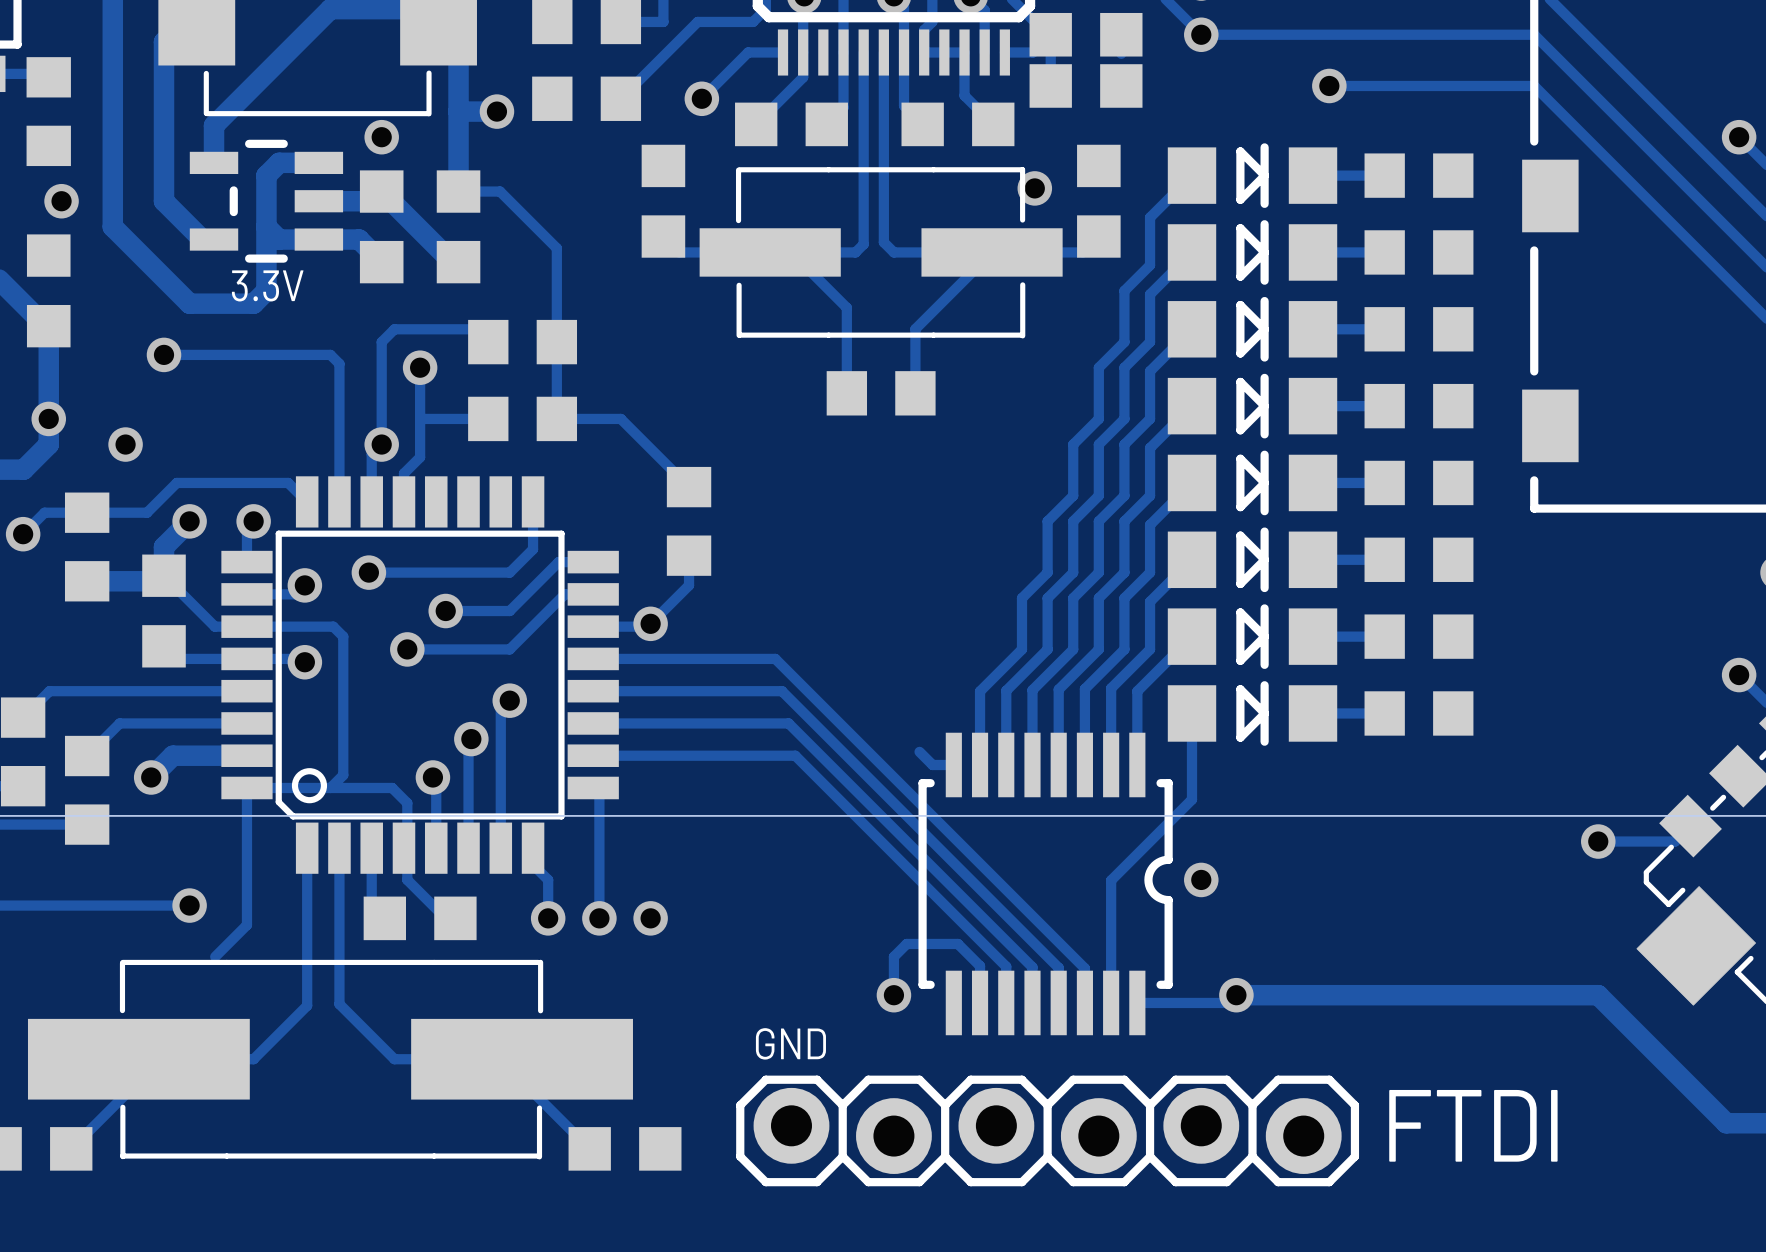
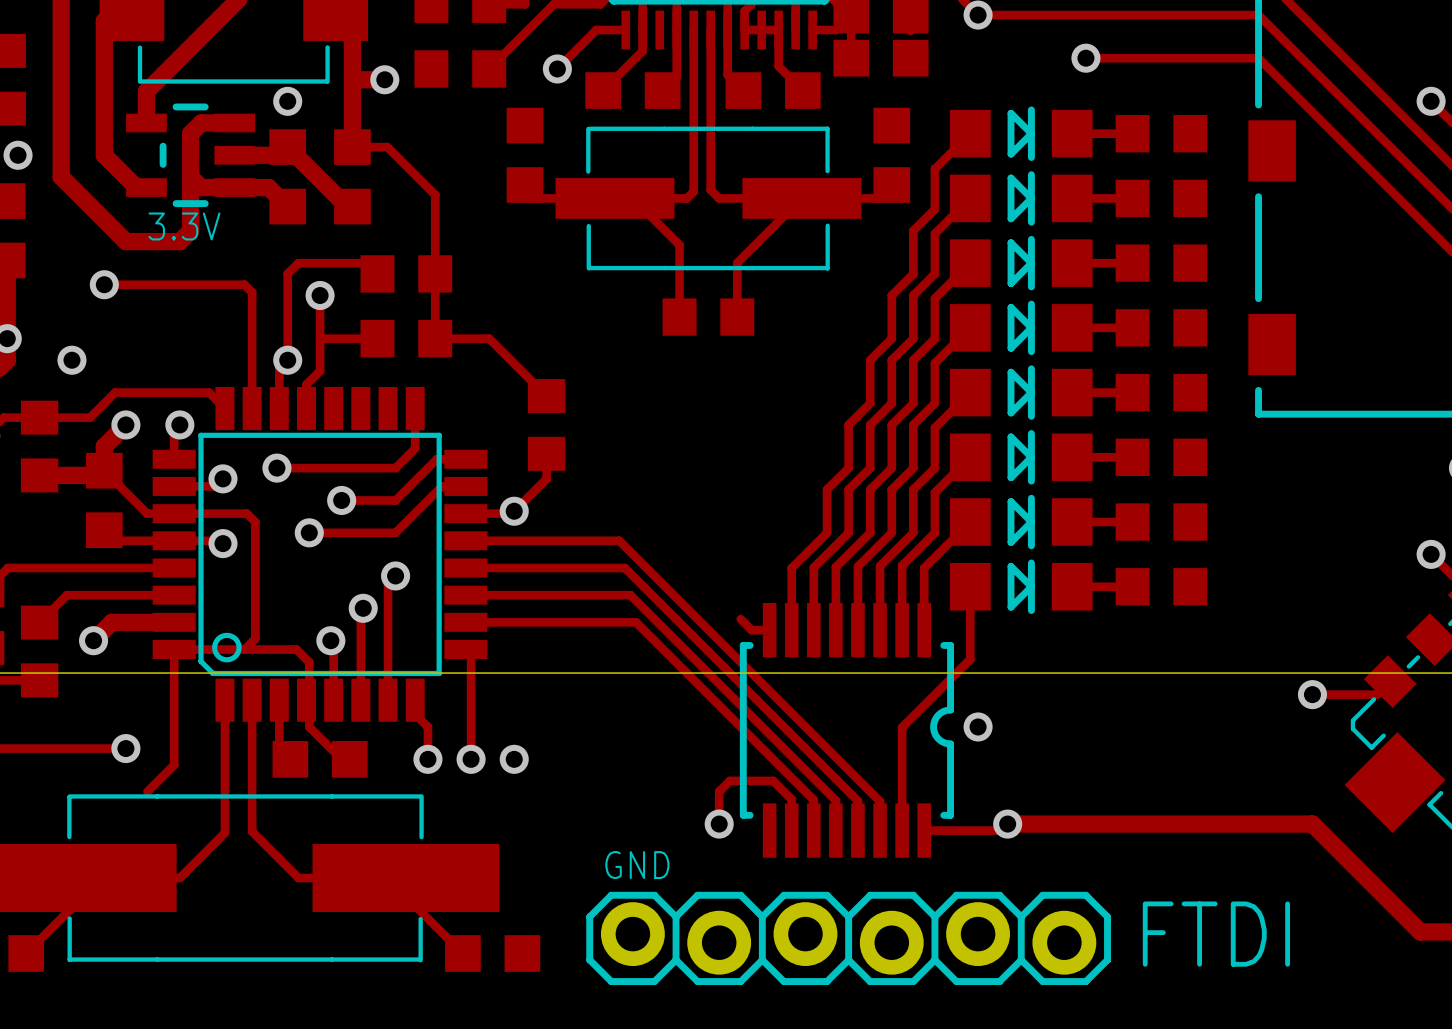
via: (1034, 188) -> none

